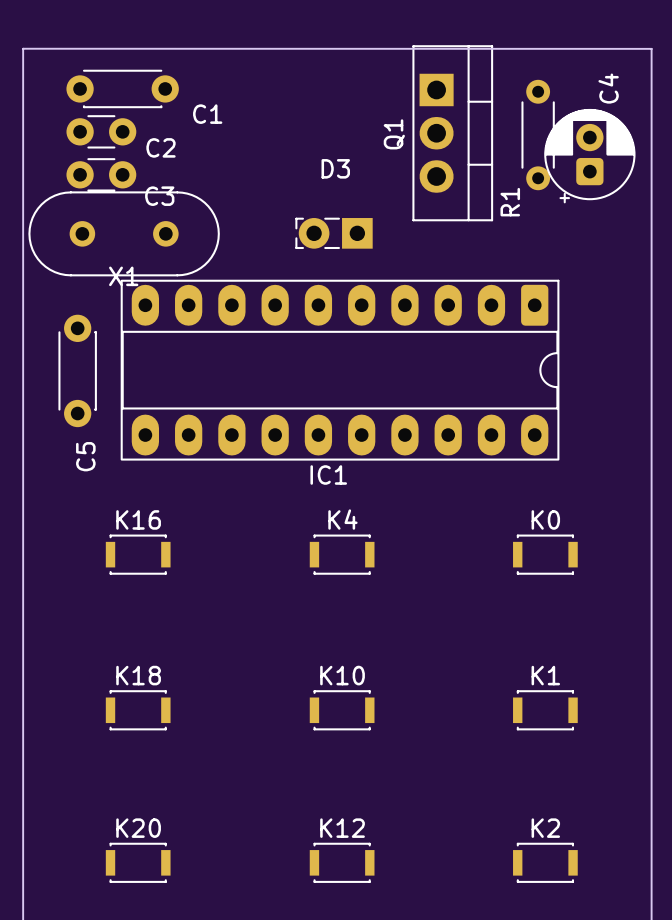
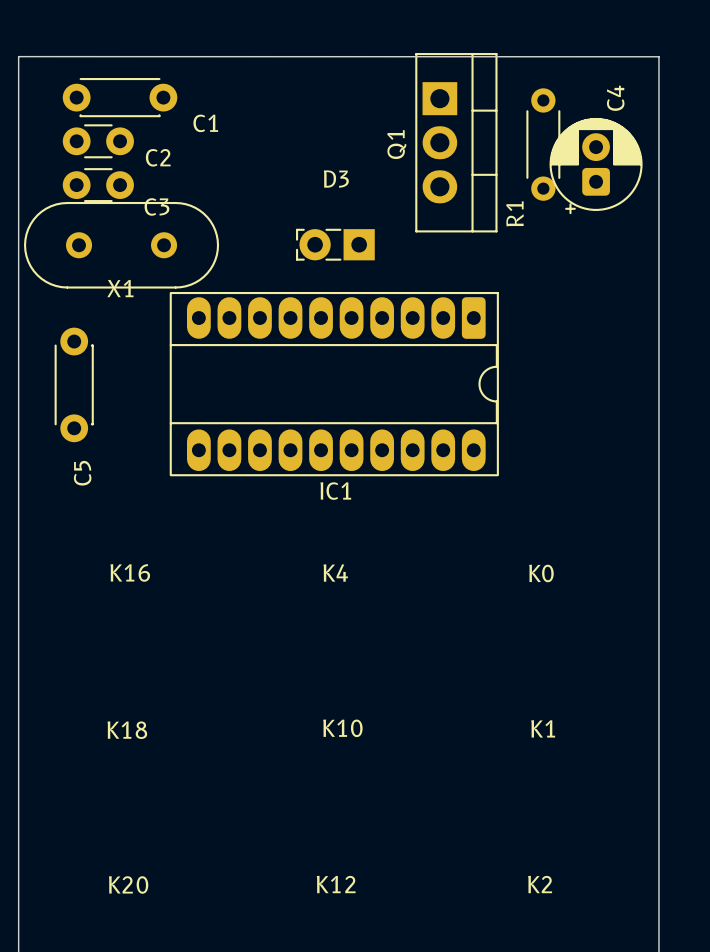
IC1 footprint: [120, 279, 560, 461] -> [169, 291, 499, 477]
K16 footprint: [105, 534, 171, 575] -> [110, 564, 151, 582]
K4 footprint: [309, 534, 375, 575] -> [323, 564, 348, 582]
K0 footprint: [513, 534, 578, 575] -> [529, 564, 554, 583]
K18 footprint: [105, 690, 171, 731] -> [107, 721, 148, 739]
K10 footprint: [309, 690, 375, 731] -> [323, 719, 363, 738]
K1 footprint: [513, 690, 578, 731] -> [531, 720, 556, 738]
K20 footprint: [105, 842, 171, 883] -> [108, 876, 149, 894]
K12 footprint: [309, 842, 375, 883] -> [316, 875, 356, 894]
K2 footprint: [513, 842, 578, 883] -> [528, 875, 553, 894]

